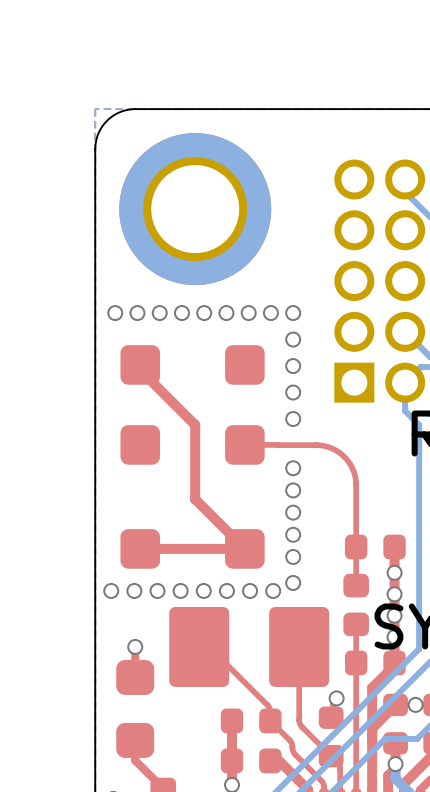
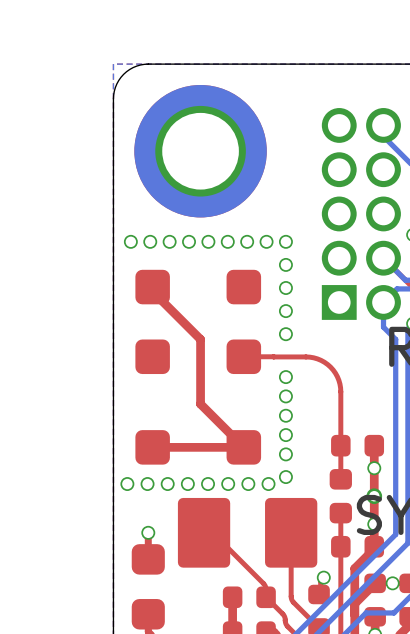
via: (394, 594) -> none
via: none -> (374, 496)
via: (394, 615) -> none

